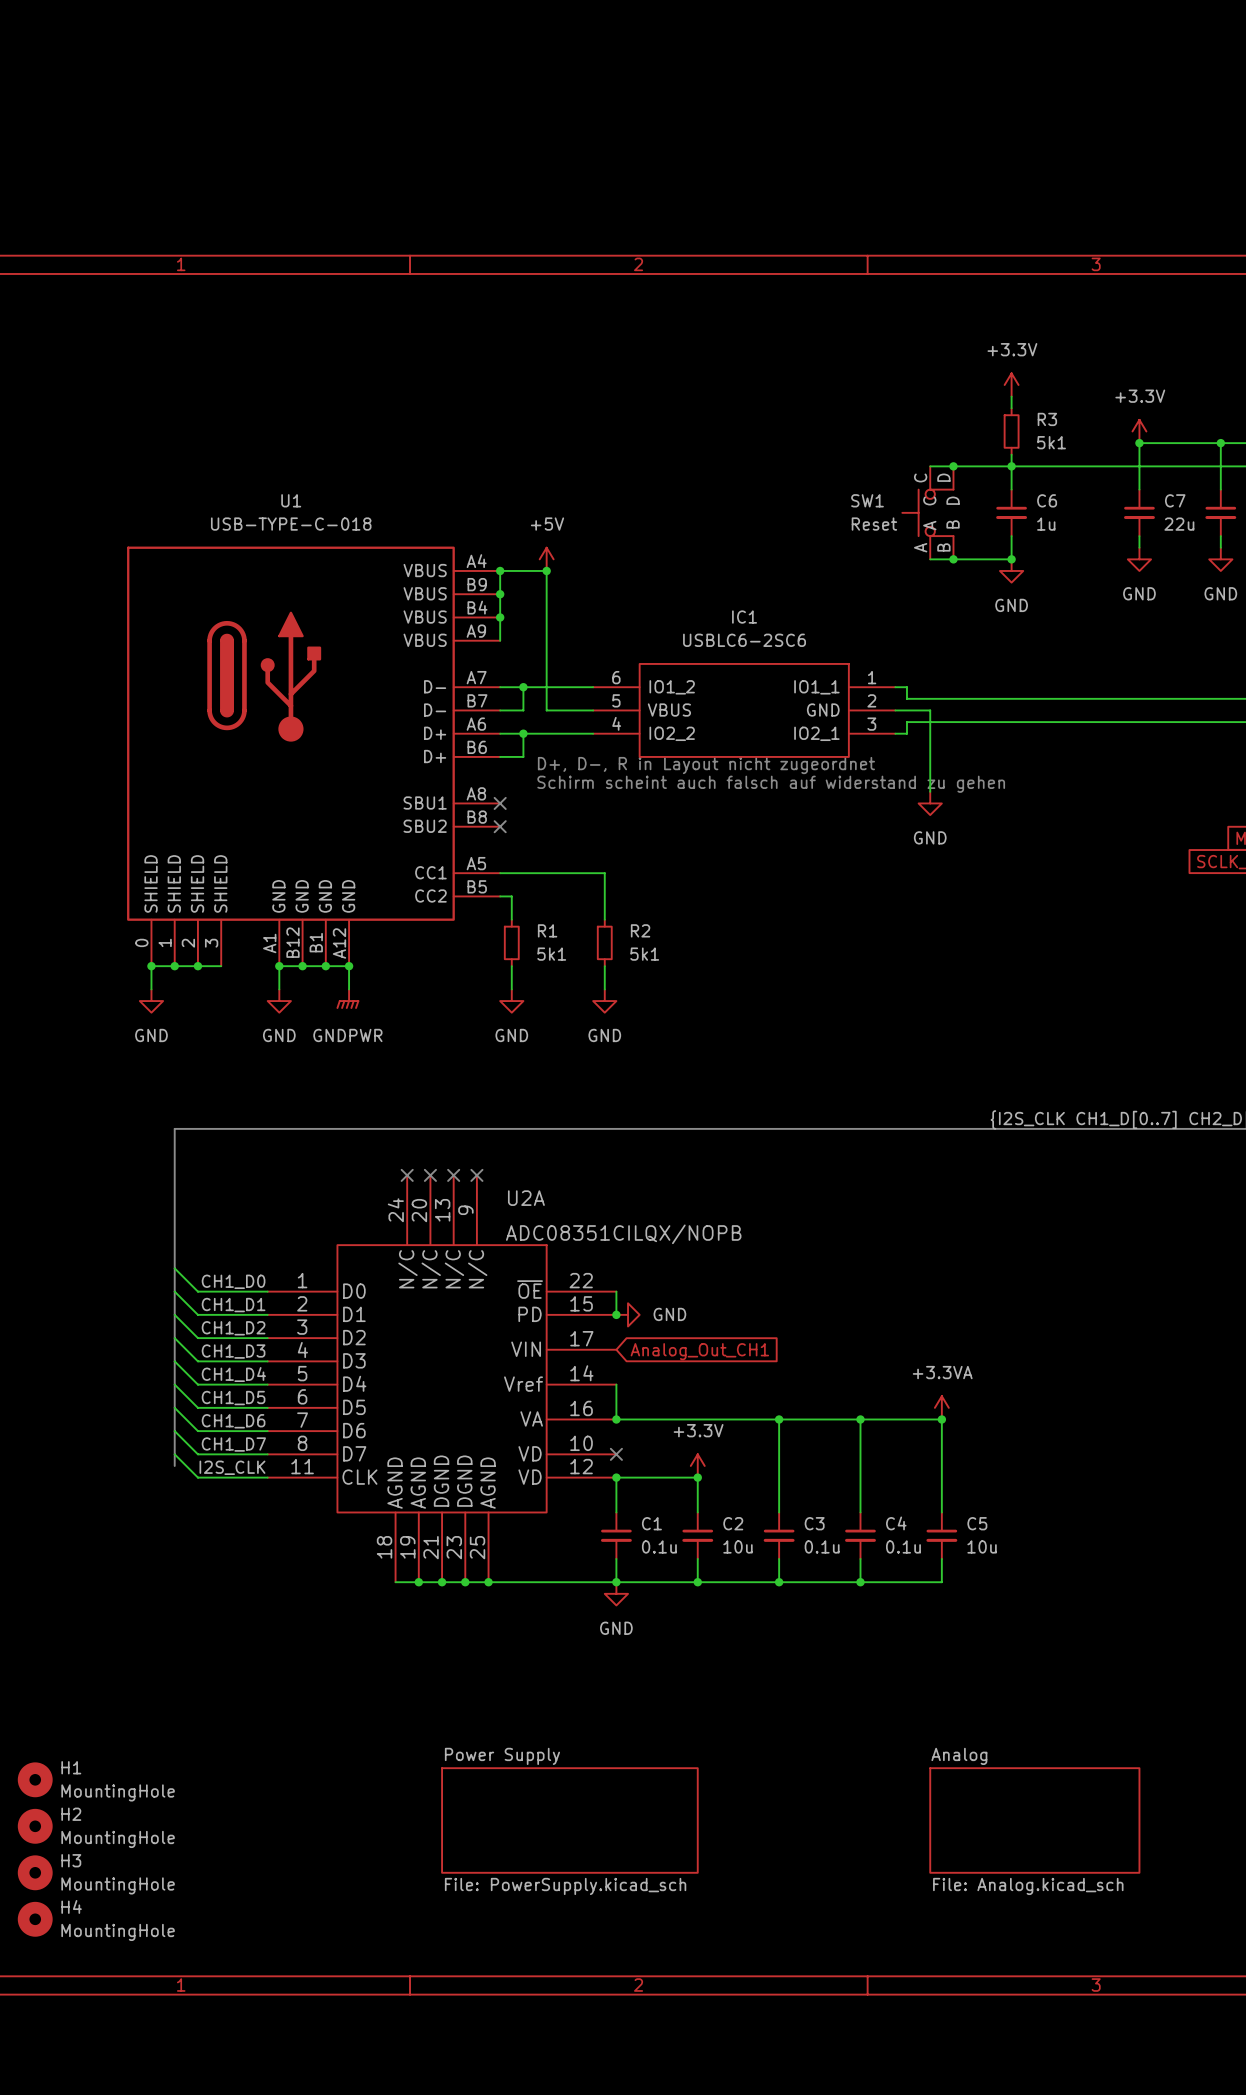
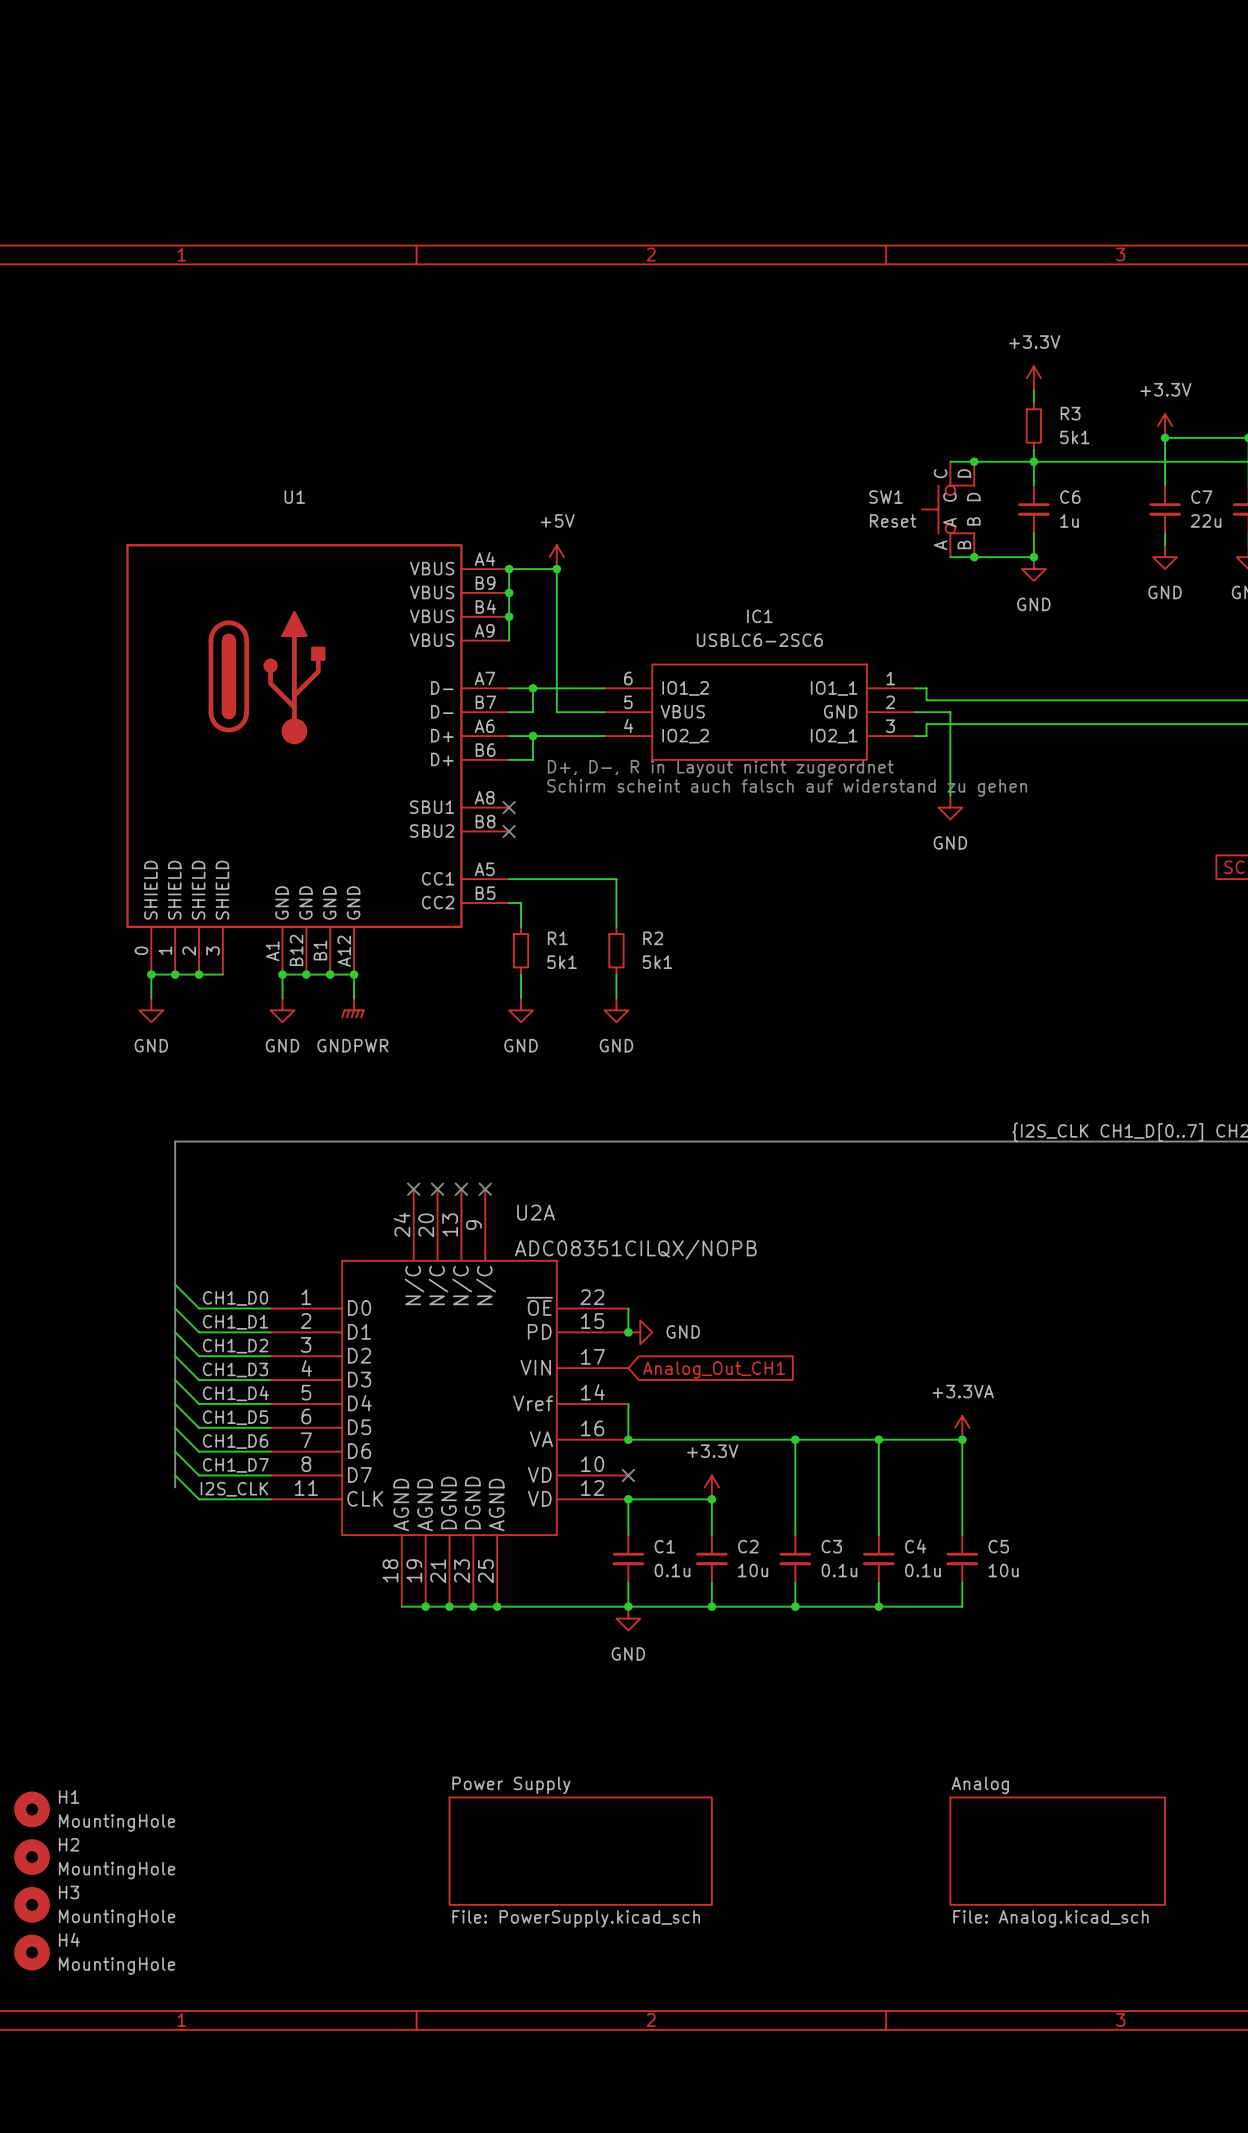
U1 value: USB-TYPE-C-018 (291, 524) -> none

